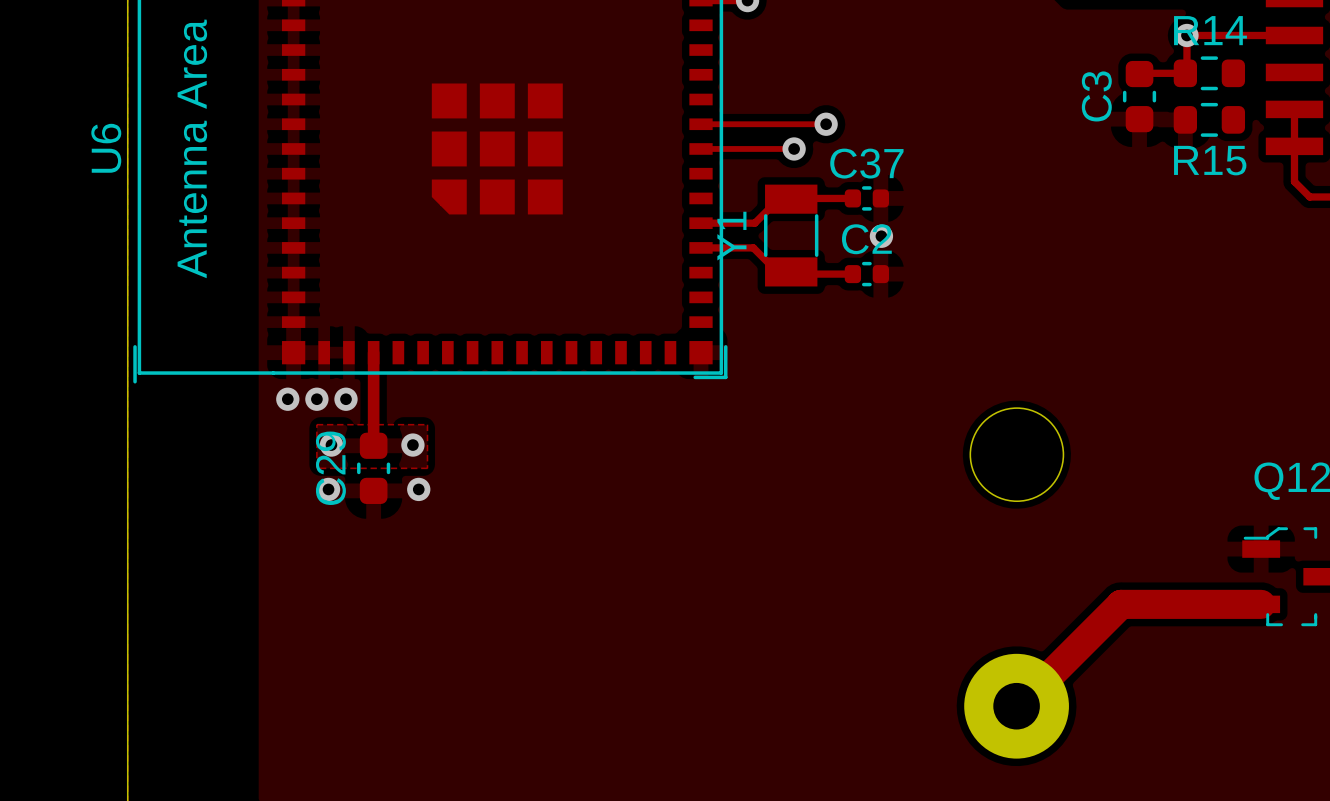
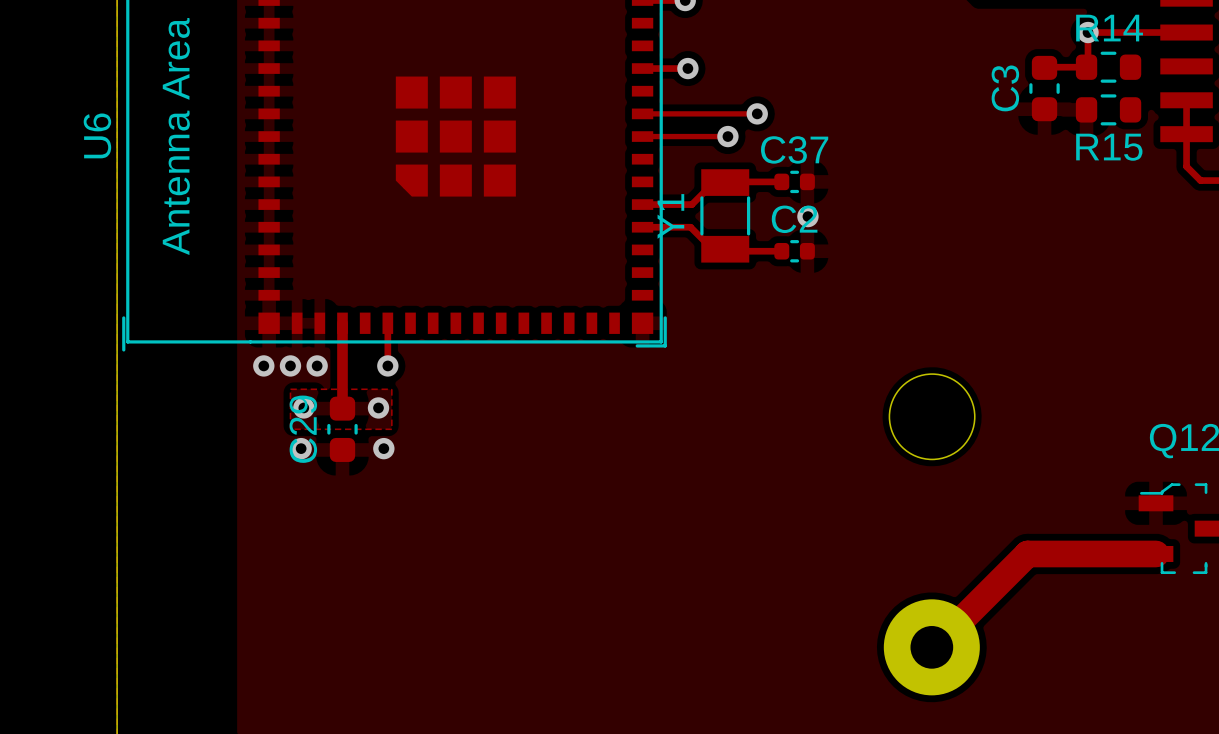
track: none -> (642, 68) (687, 68)
via: none -> (687, 68)
track: none -> (387, 323) (387, 365)
via: none -> (387, 365)

